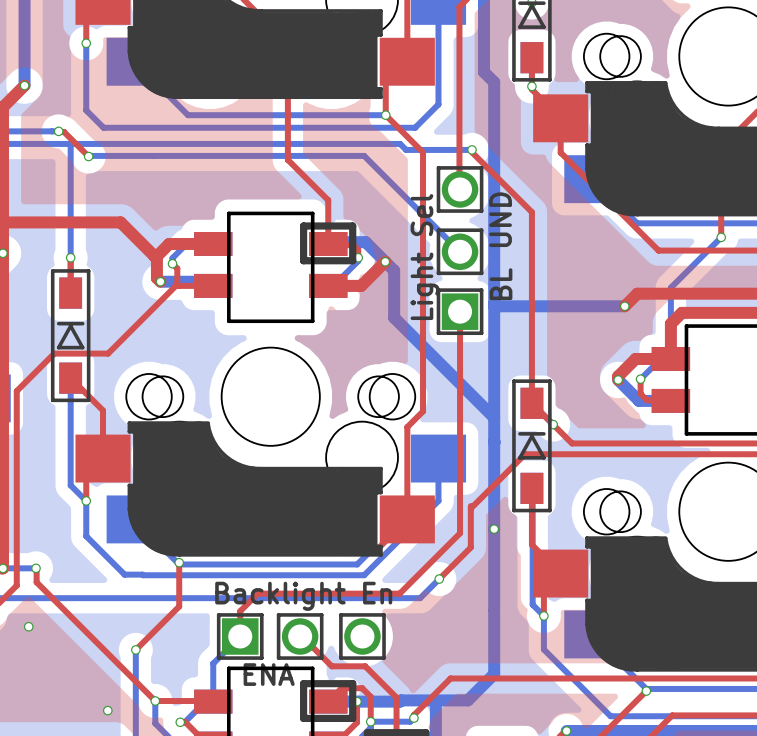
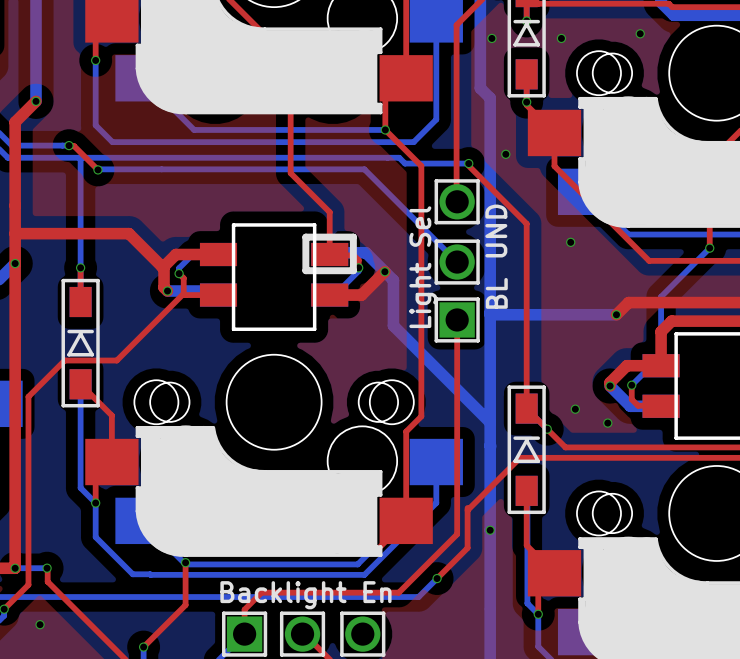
via: none -> (640, 33)
via: none -> (491, 38)
via: none -> (561, 38)
via: none -> (505, 154)
via: none -> (570, 242)
via: none -> (575, 409)
via: none -> (607, 423)

